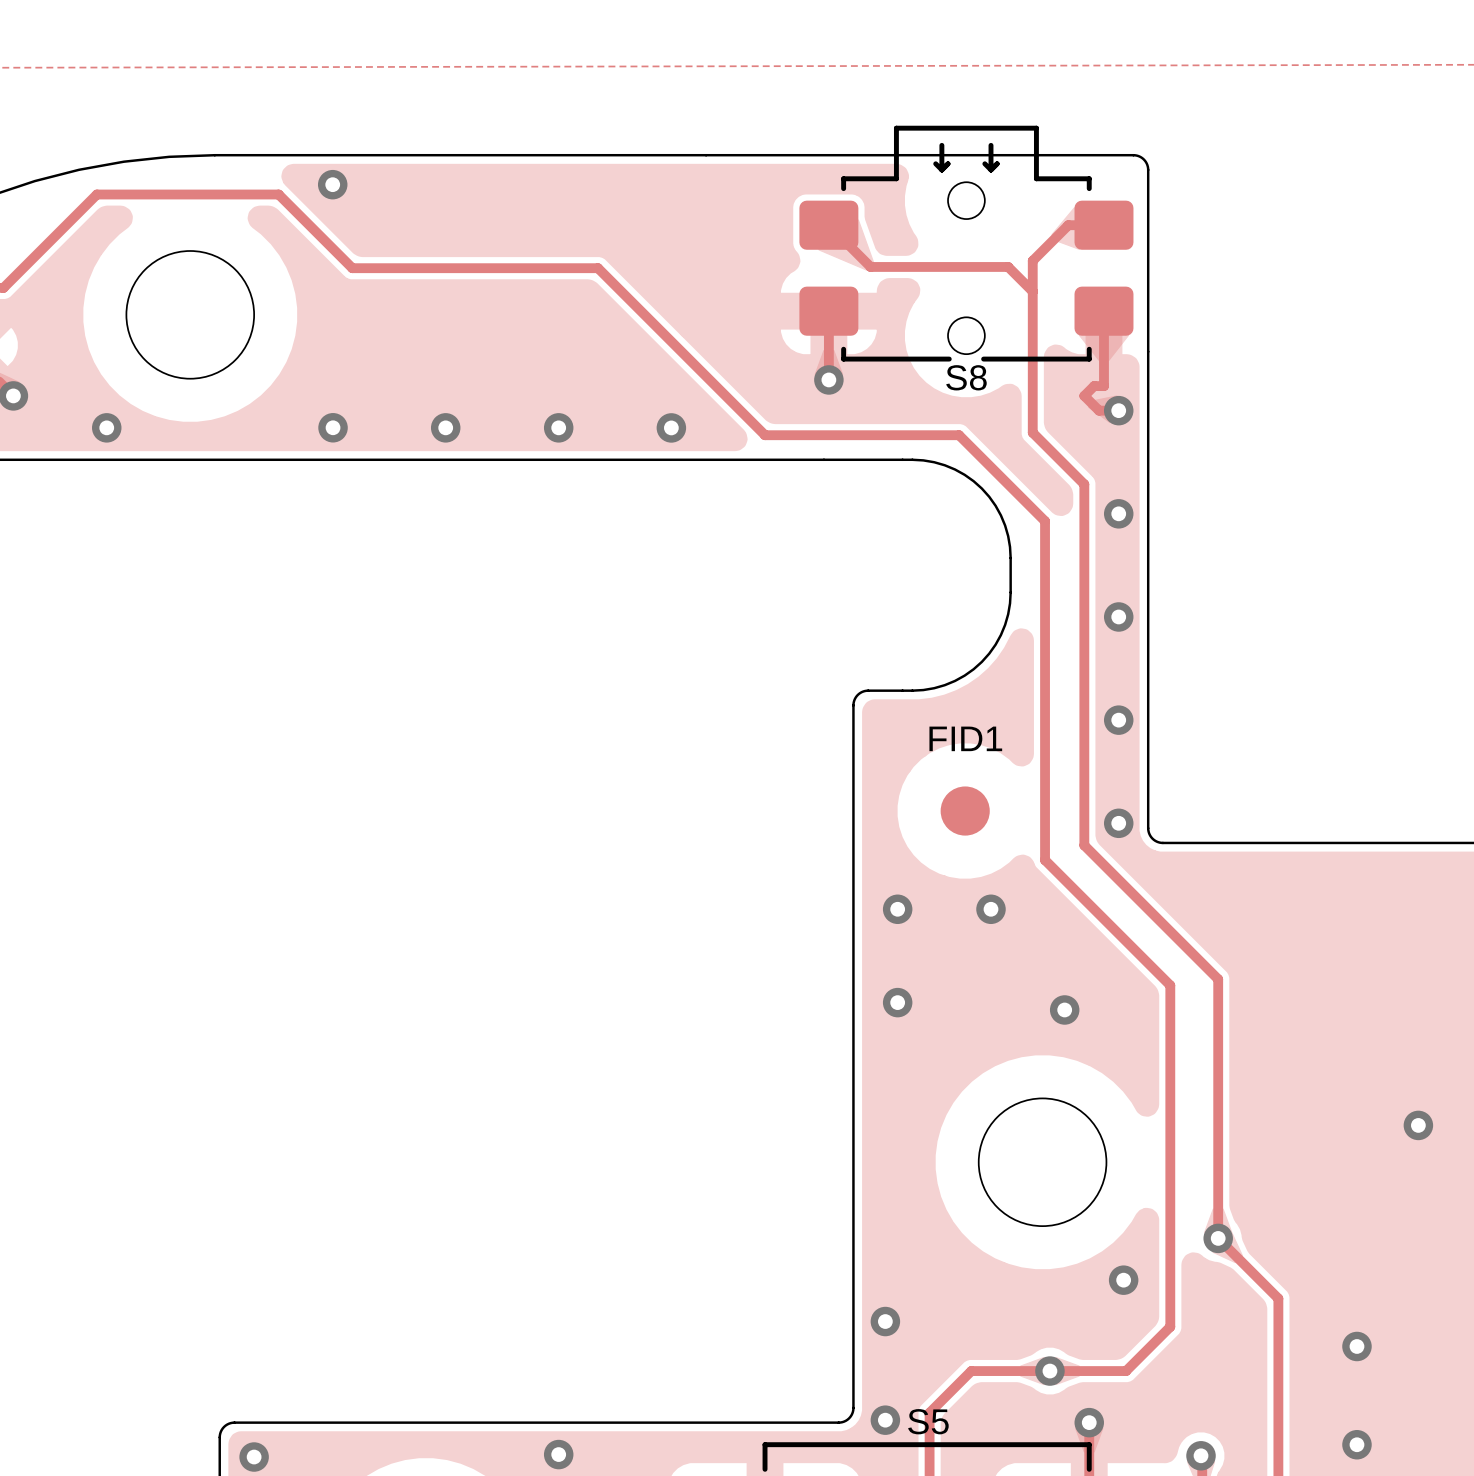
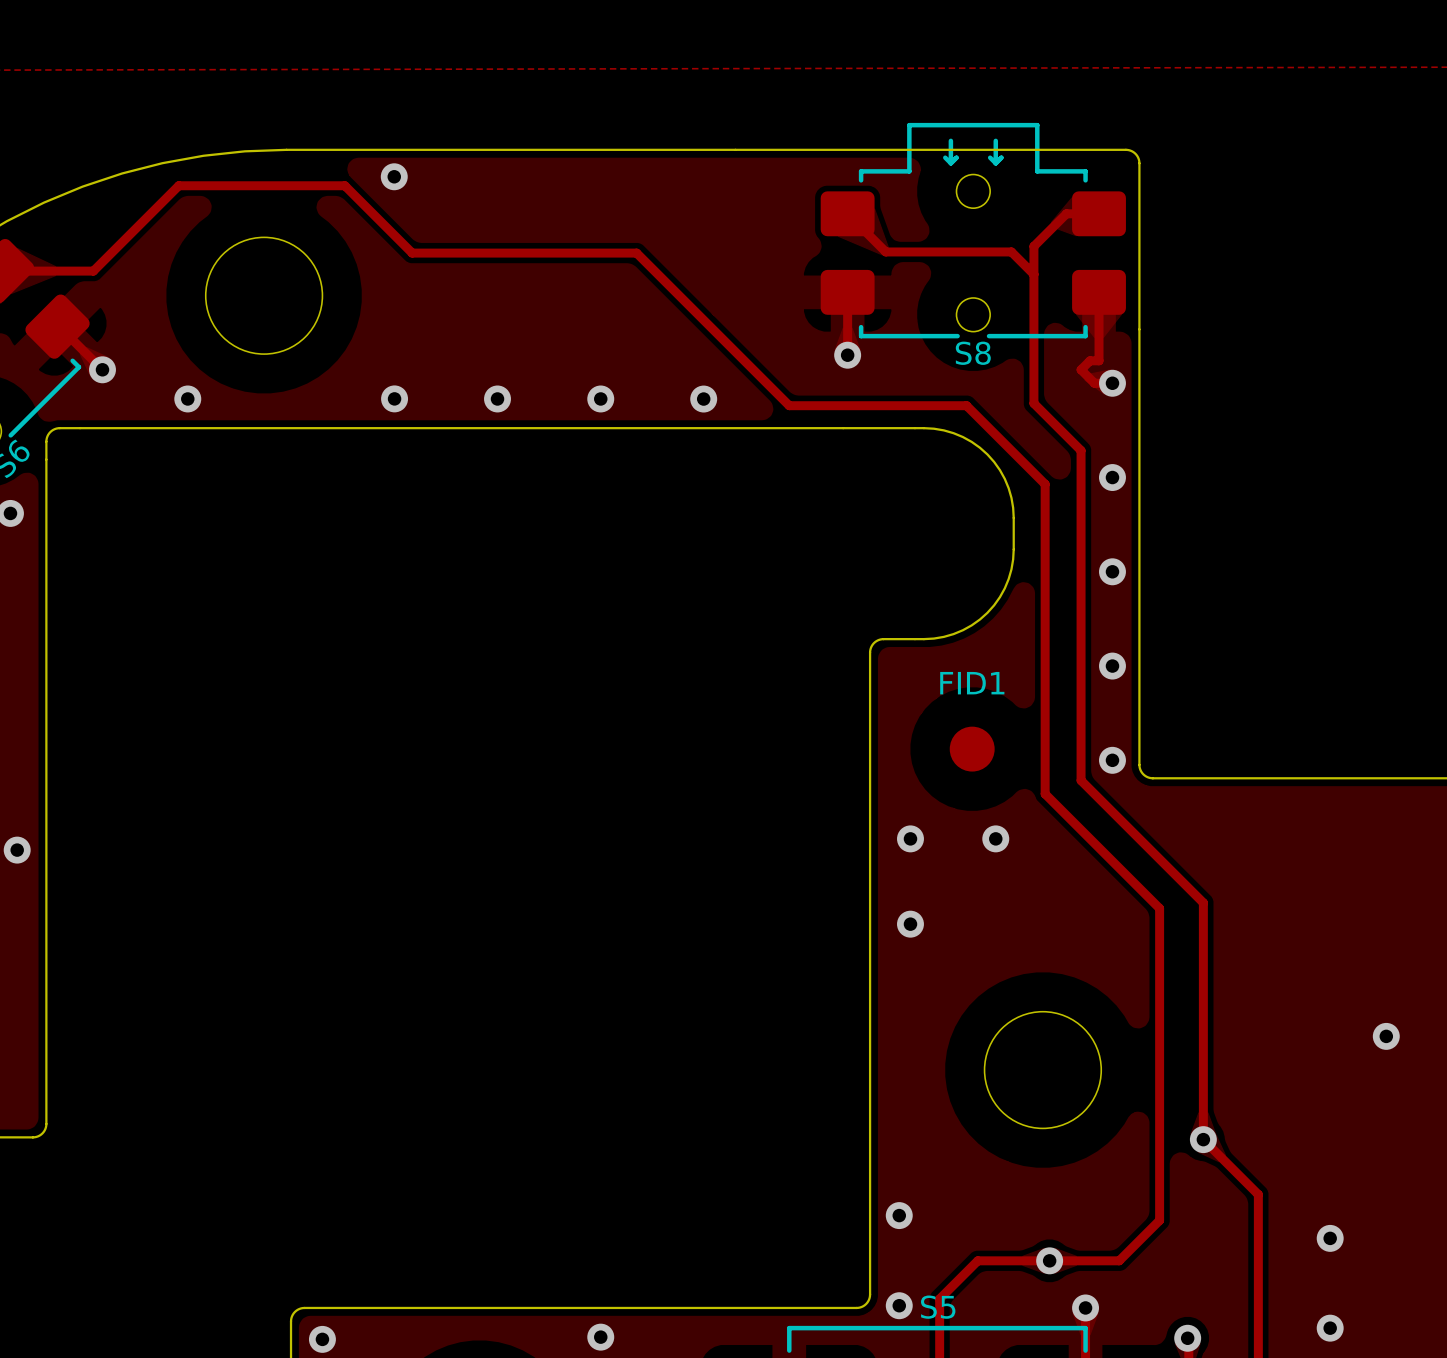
via: (1064, 1009) -> none
via: (1123, 1280) -> none

